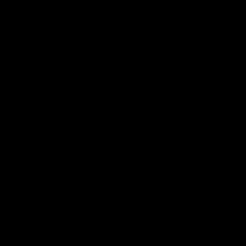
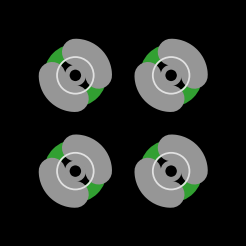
part: none -> (75, 75)
part: none -> (171, 75)
part: none -> (75, 171)
part: none -> (171, 171)

